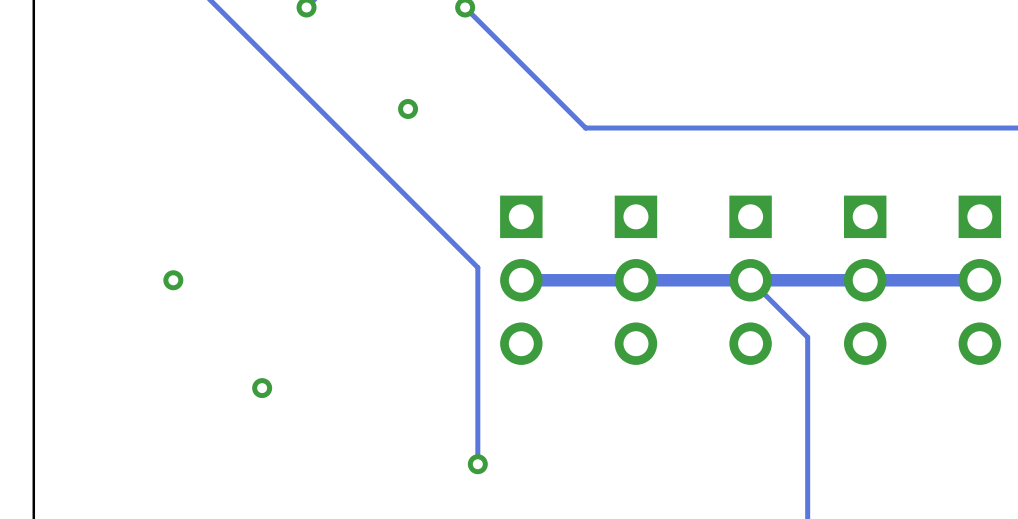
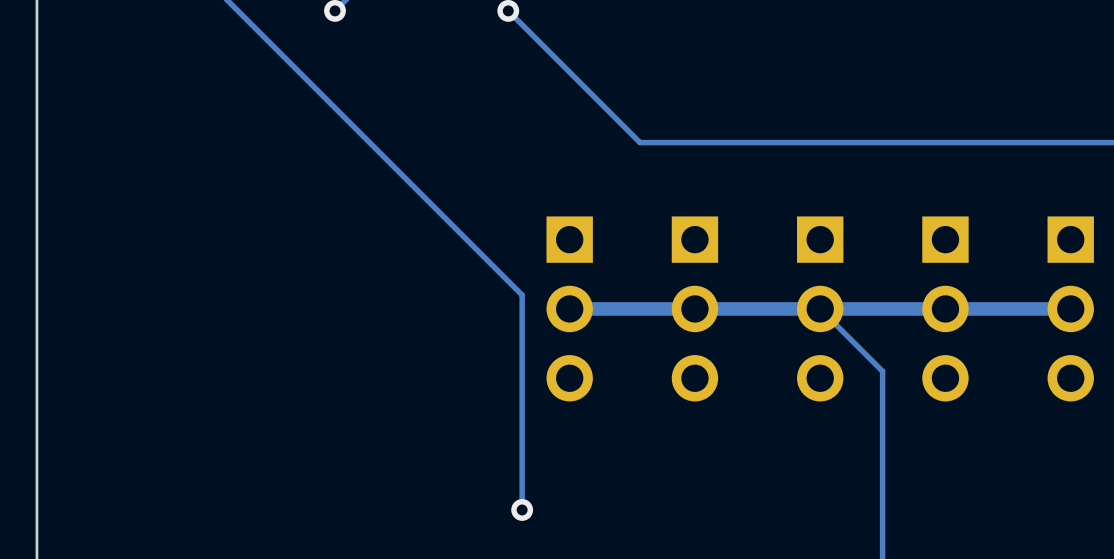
via: (408, 108) -> none
via: (173, 280) -> none
via: (262, 388) -> none

